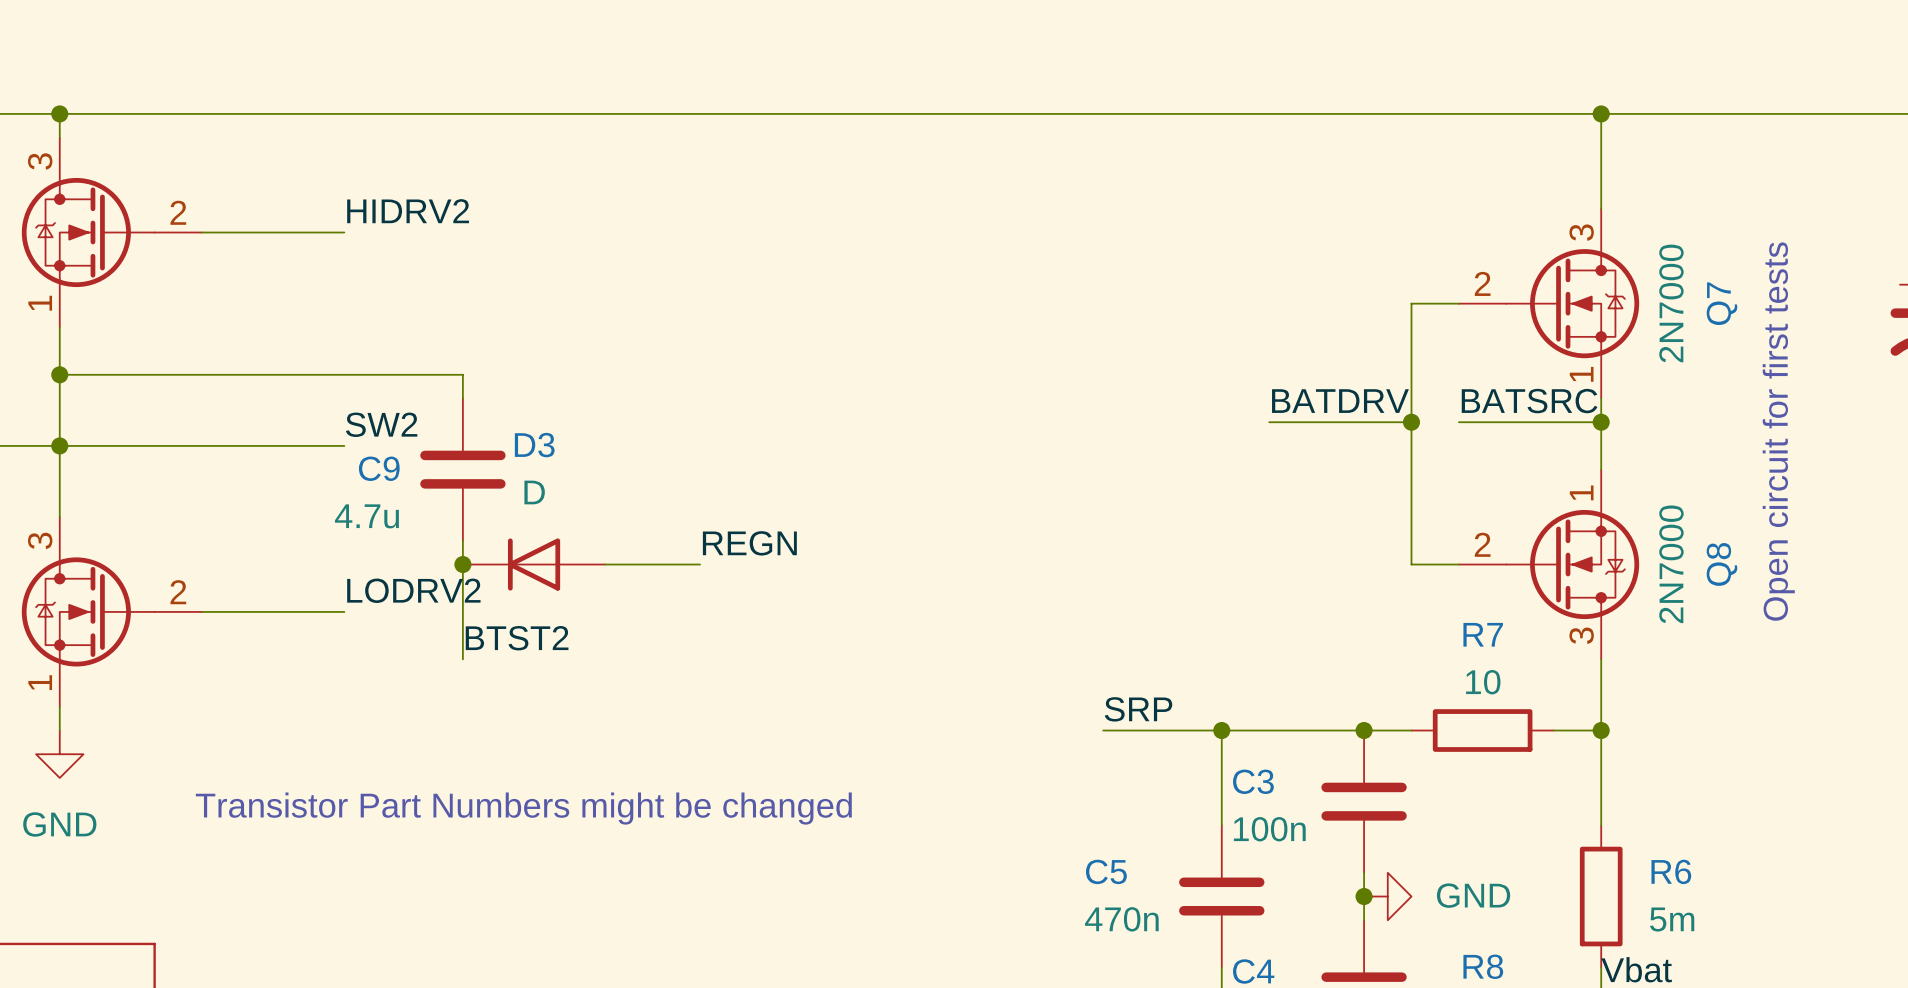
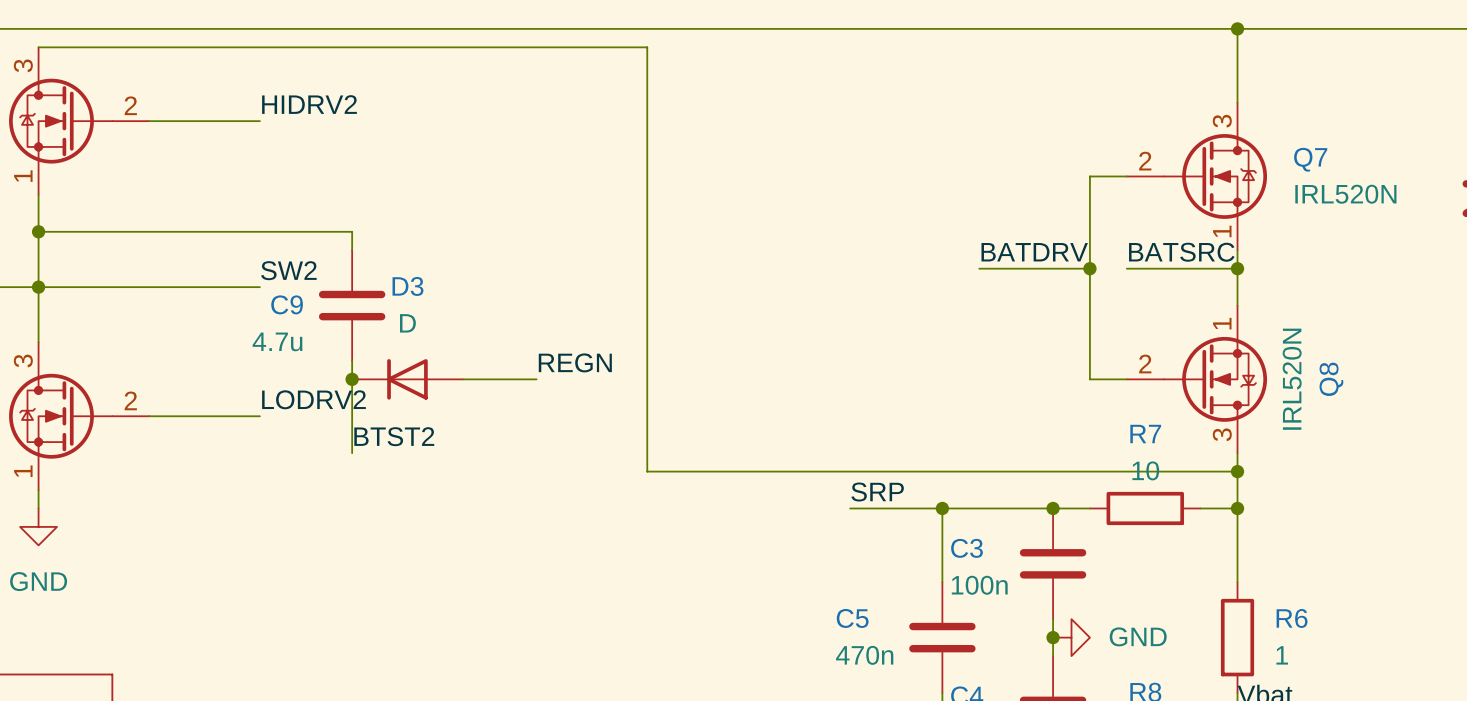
wire: (59, 113) (59, 137) -> (1237, 471) (647, 471) (647, 47) (38, 47)
junction: (59, 113) -> none
Q7 value: 2N7000 (1671, 303) -> IRL520N (1345, 194)
Q7 name rotation: 0° (1721, 303) -> 90° clockwise (1310, 159)
text: Open circuit for first tests (1778, 431) -> none
Q8 value: 2N7000 (1671, 564) -> IRL520N (1292, 379)
junction: none -> (1237, 471)
text: Transistor Part Numbers might be changed (523, 808) -> none
R6 value: 5m (1672, 919) -> 1 (1282, 655)

